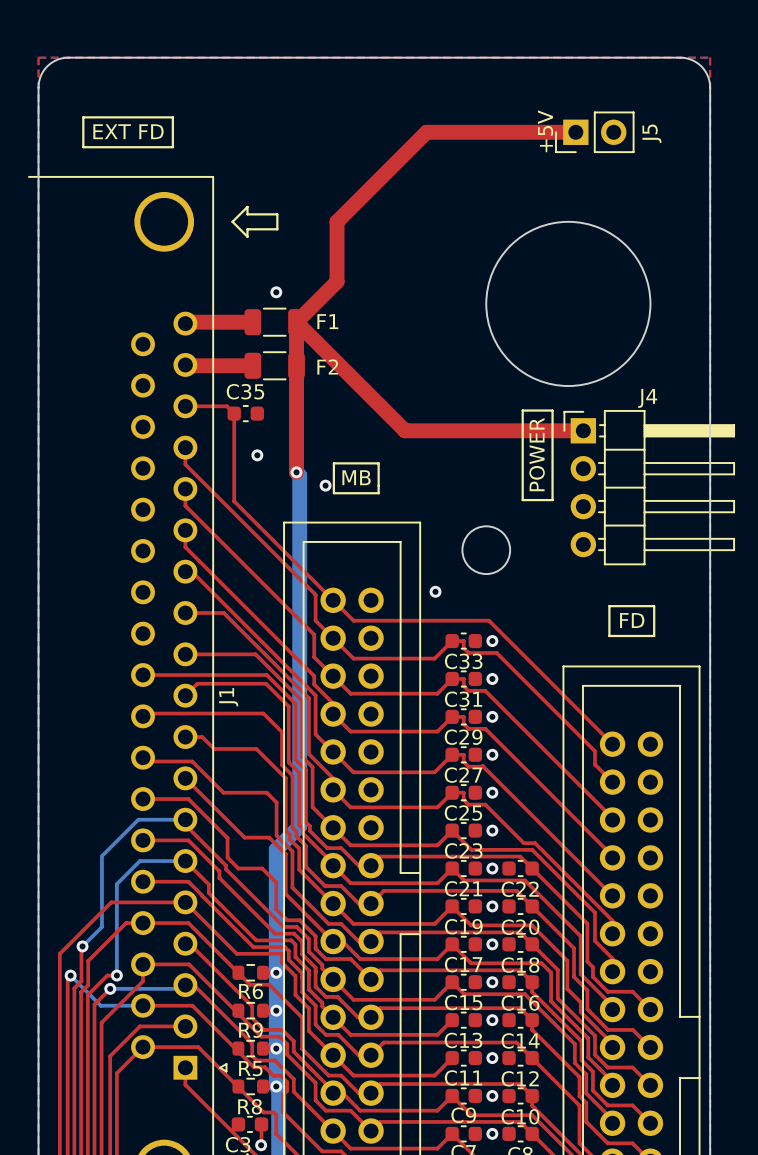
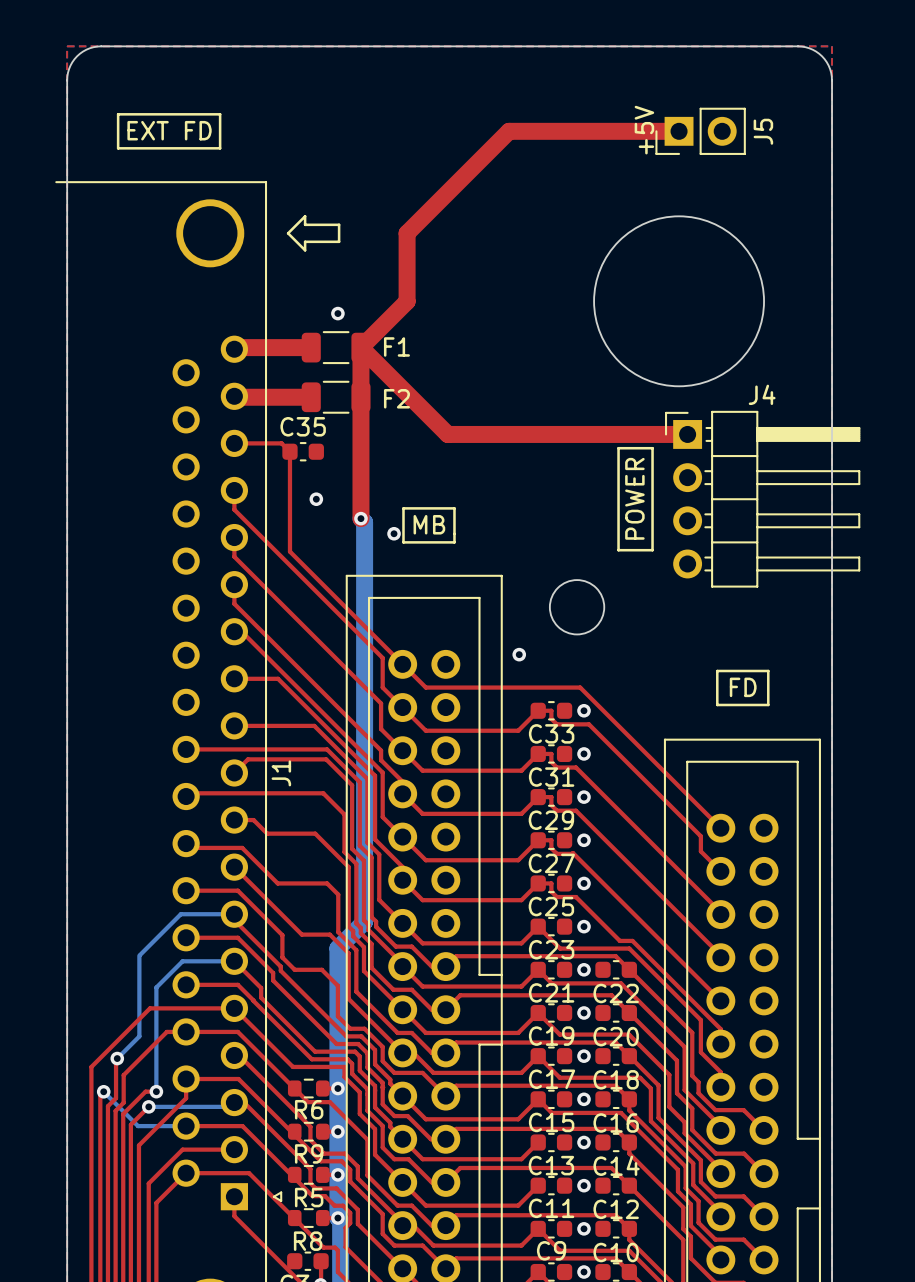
round board edge: none -> [593, 215, 765, 388]
round board edge: [485, 221, 652, 387] -> none
top track: (372, 398) (405, 430) (583, 430) -> (447, 434) (687, 434)
J4 position: (649, 487) -> (762, 499)

